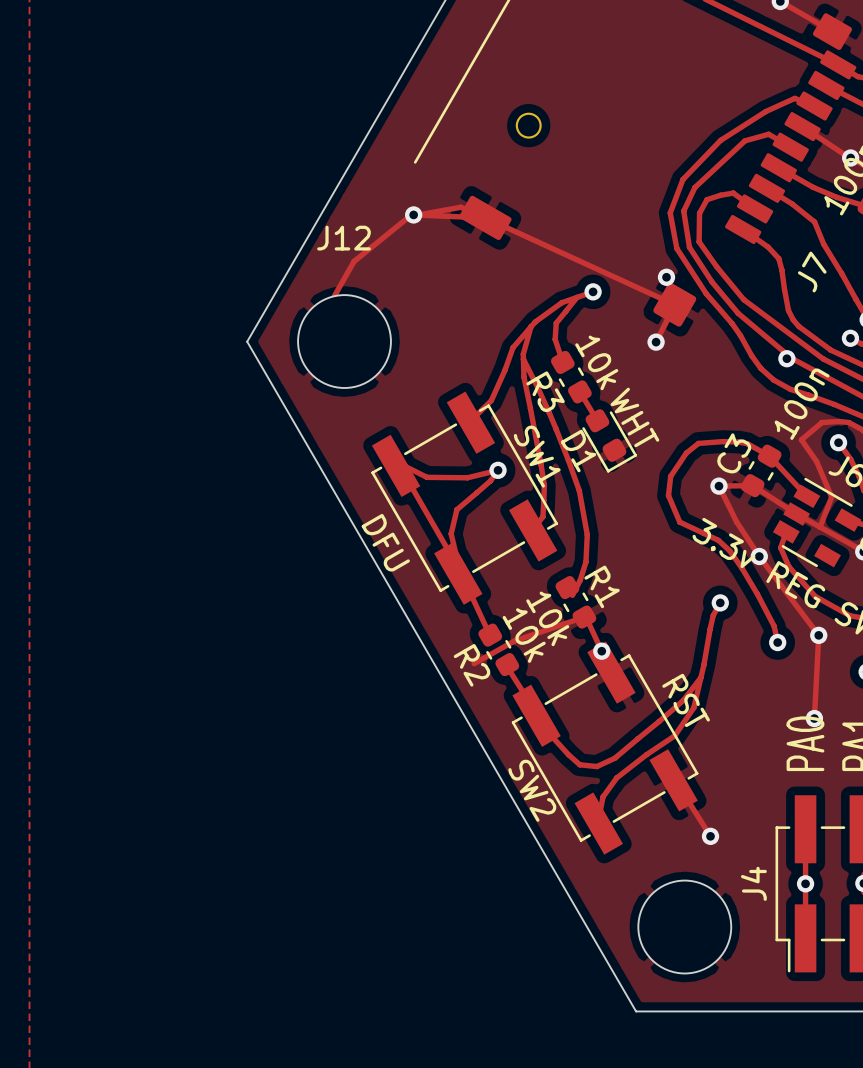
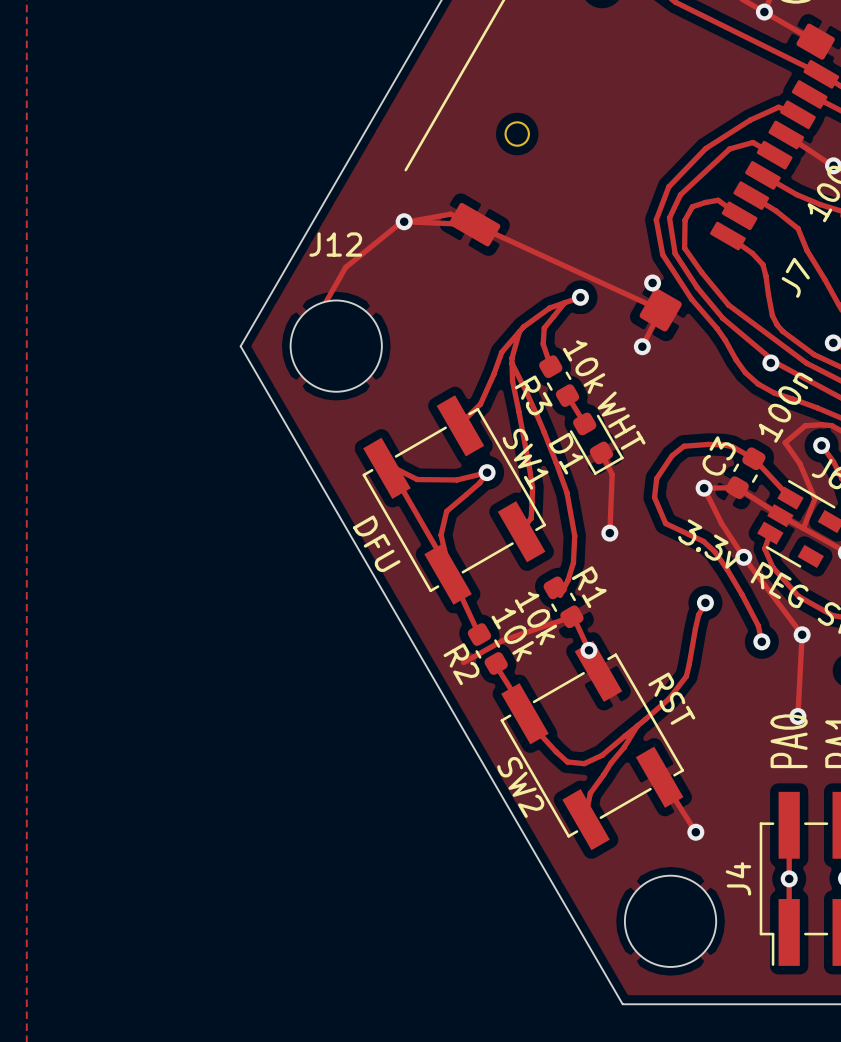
track: none -> (601, 452) (612, 474) (609, 533)
via: none -> (609, 533)
track: (700, 677) (693, 707) (674, 735) (616, 777) -> (637, 725) (603, 774)

